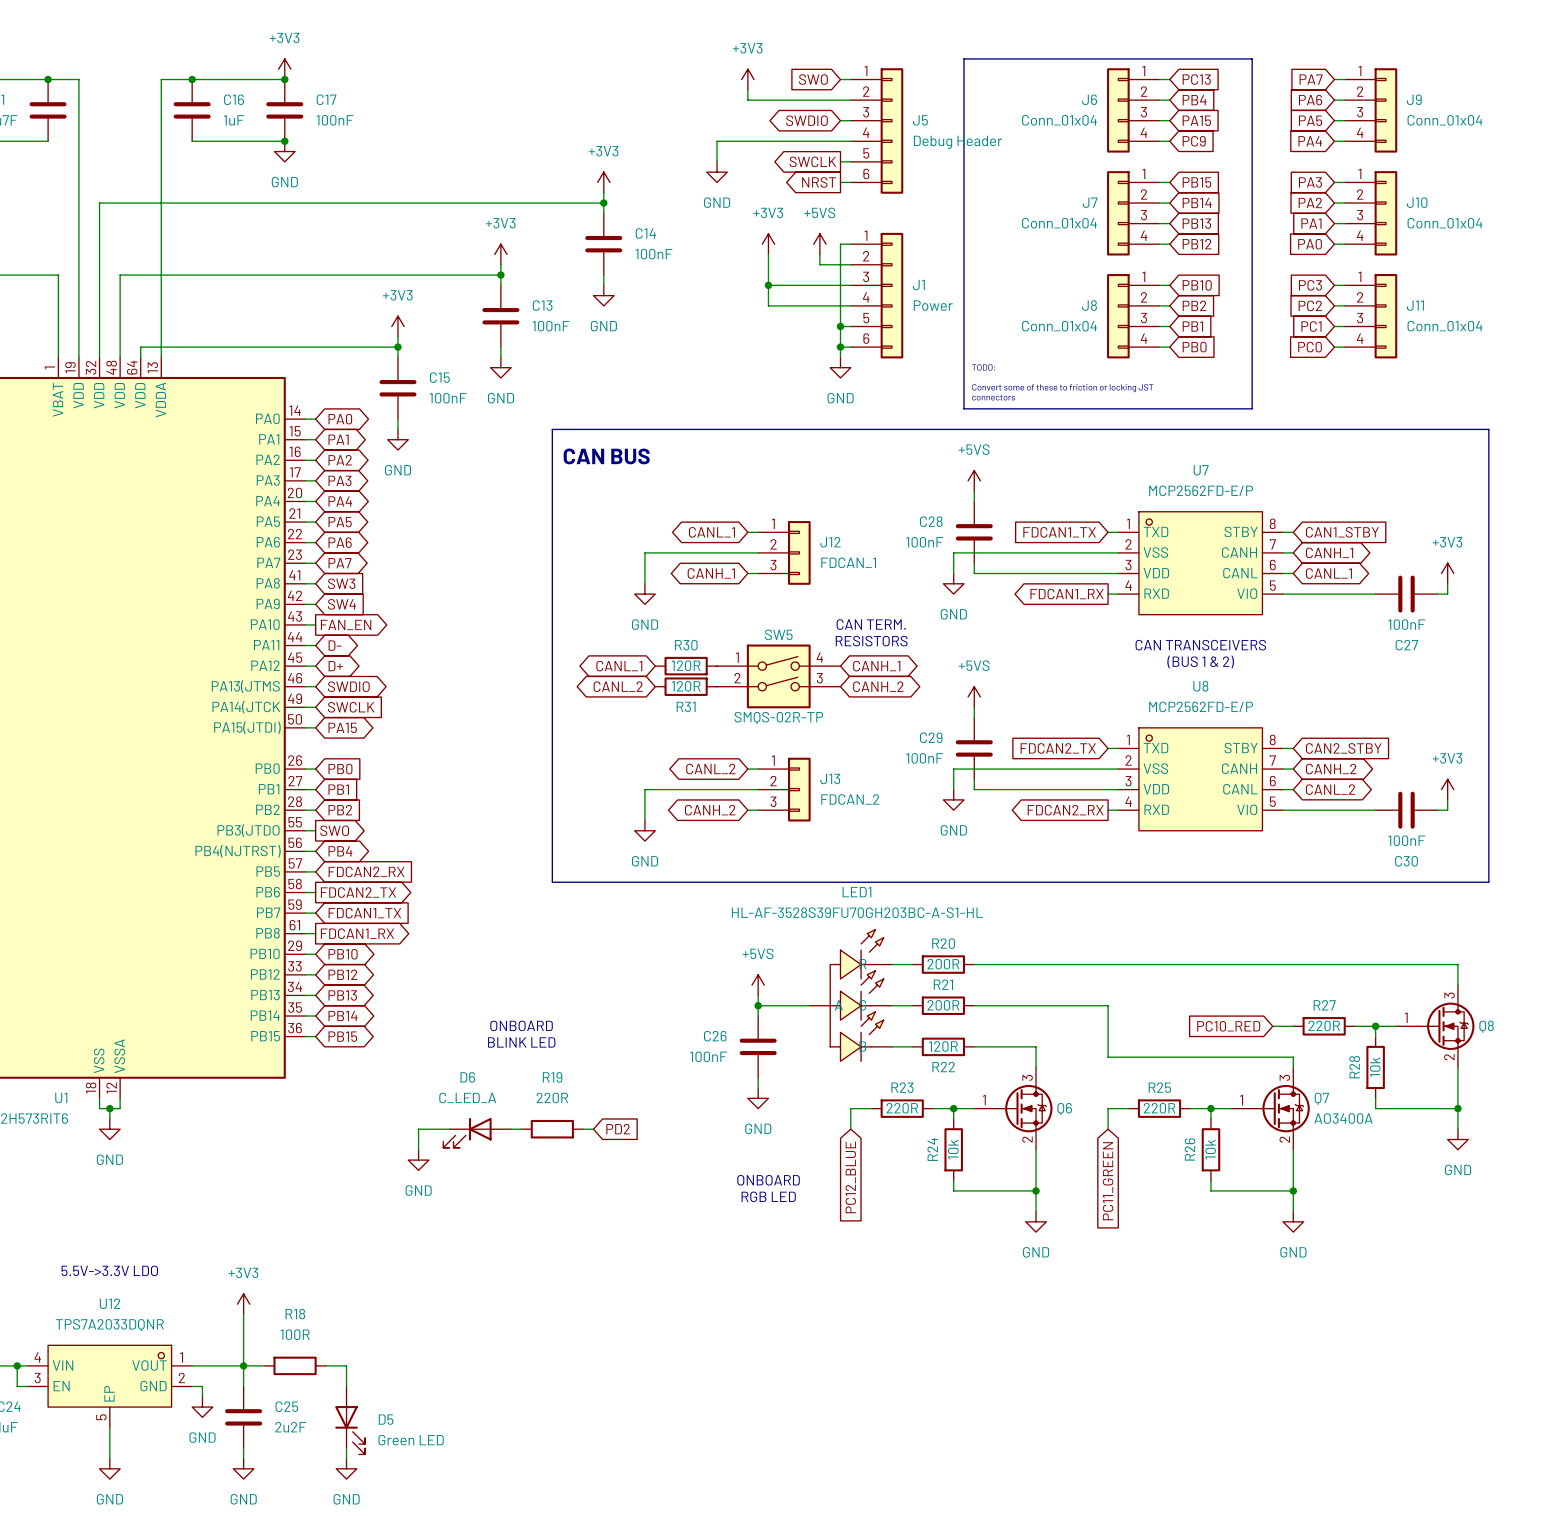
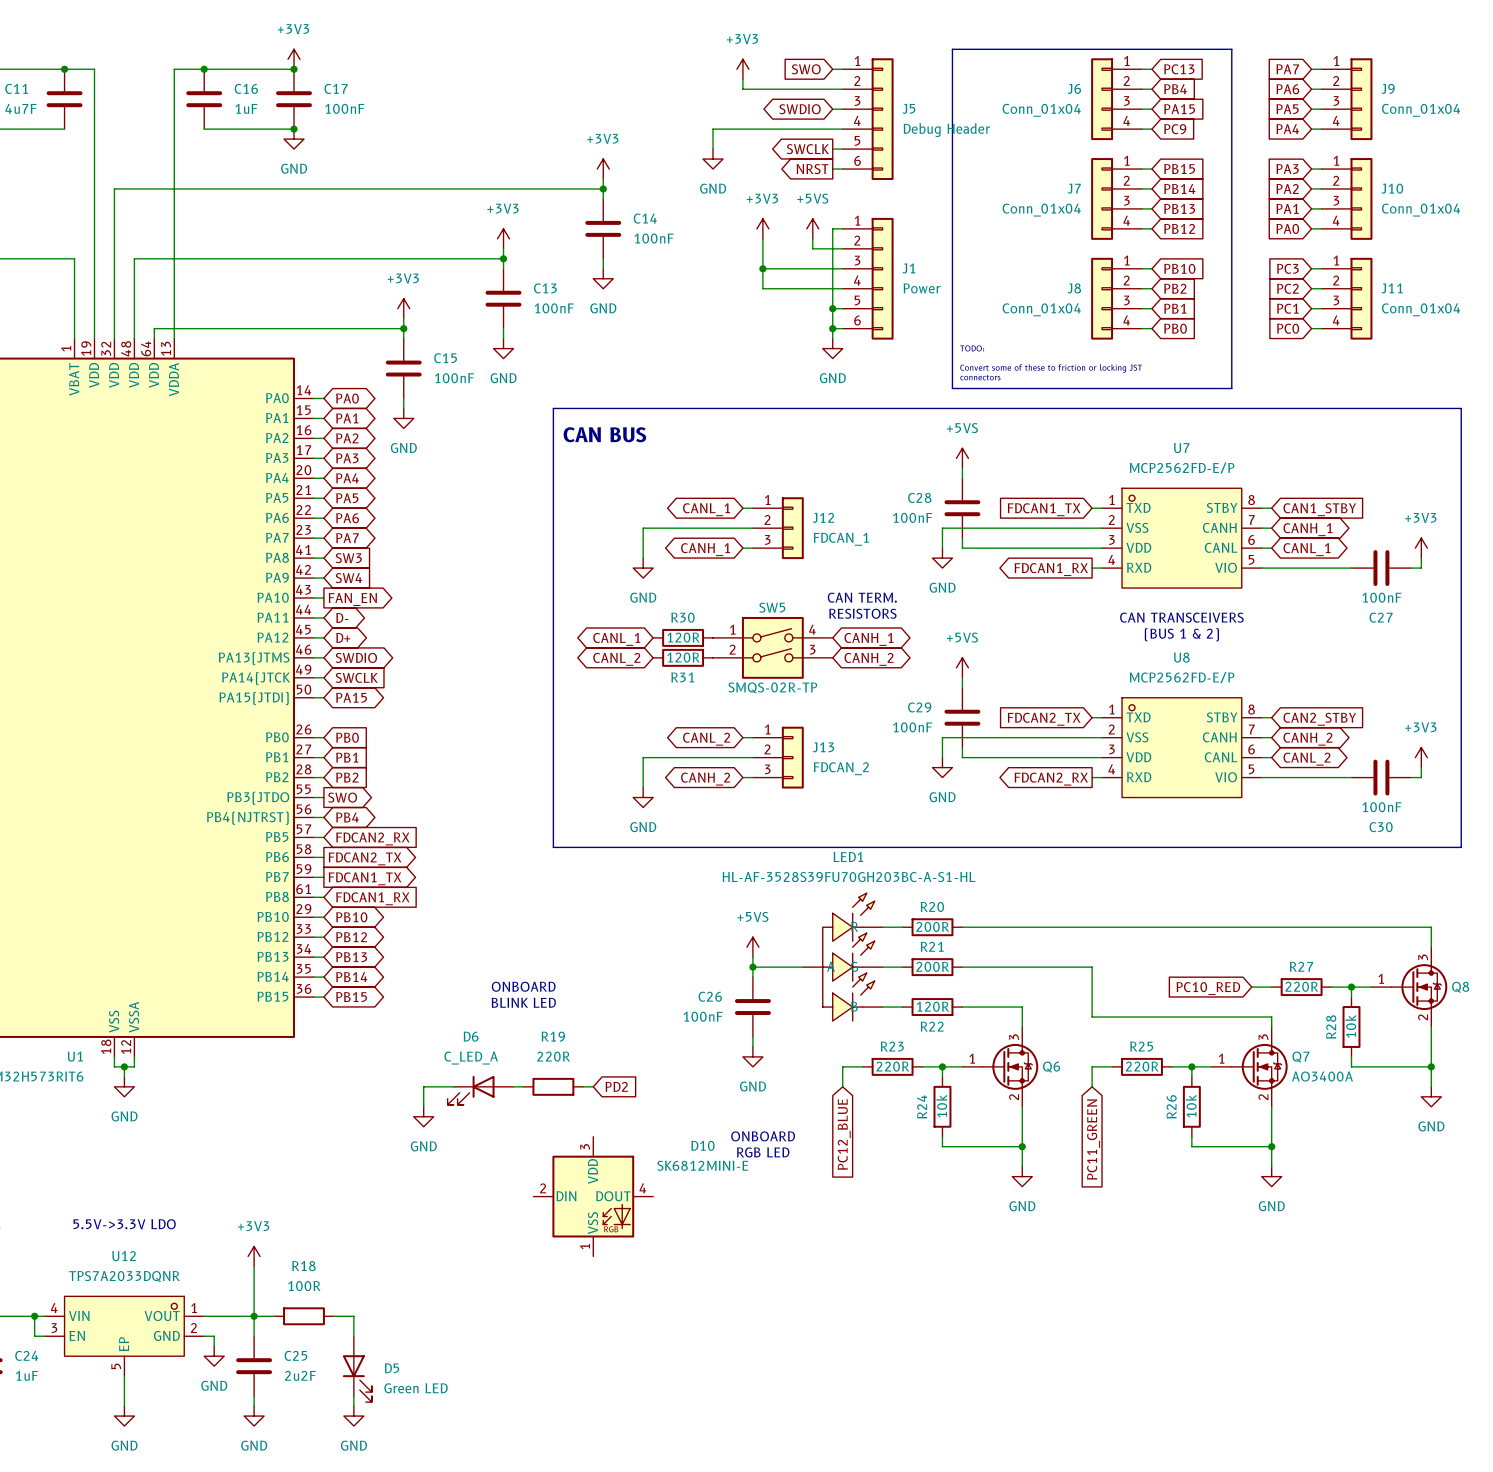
global label shape: input (364, 913) -> output (365, 878)
global label shape: output (357, 933) -> input (372, 898)
D10: none -> SK6812MINI-E (593, 1196)

